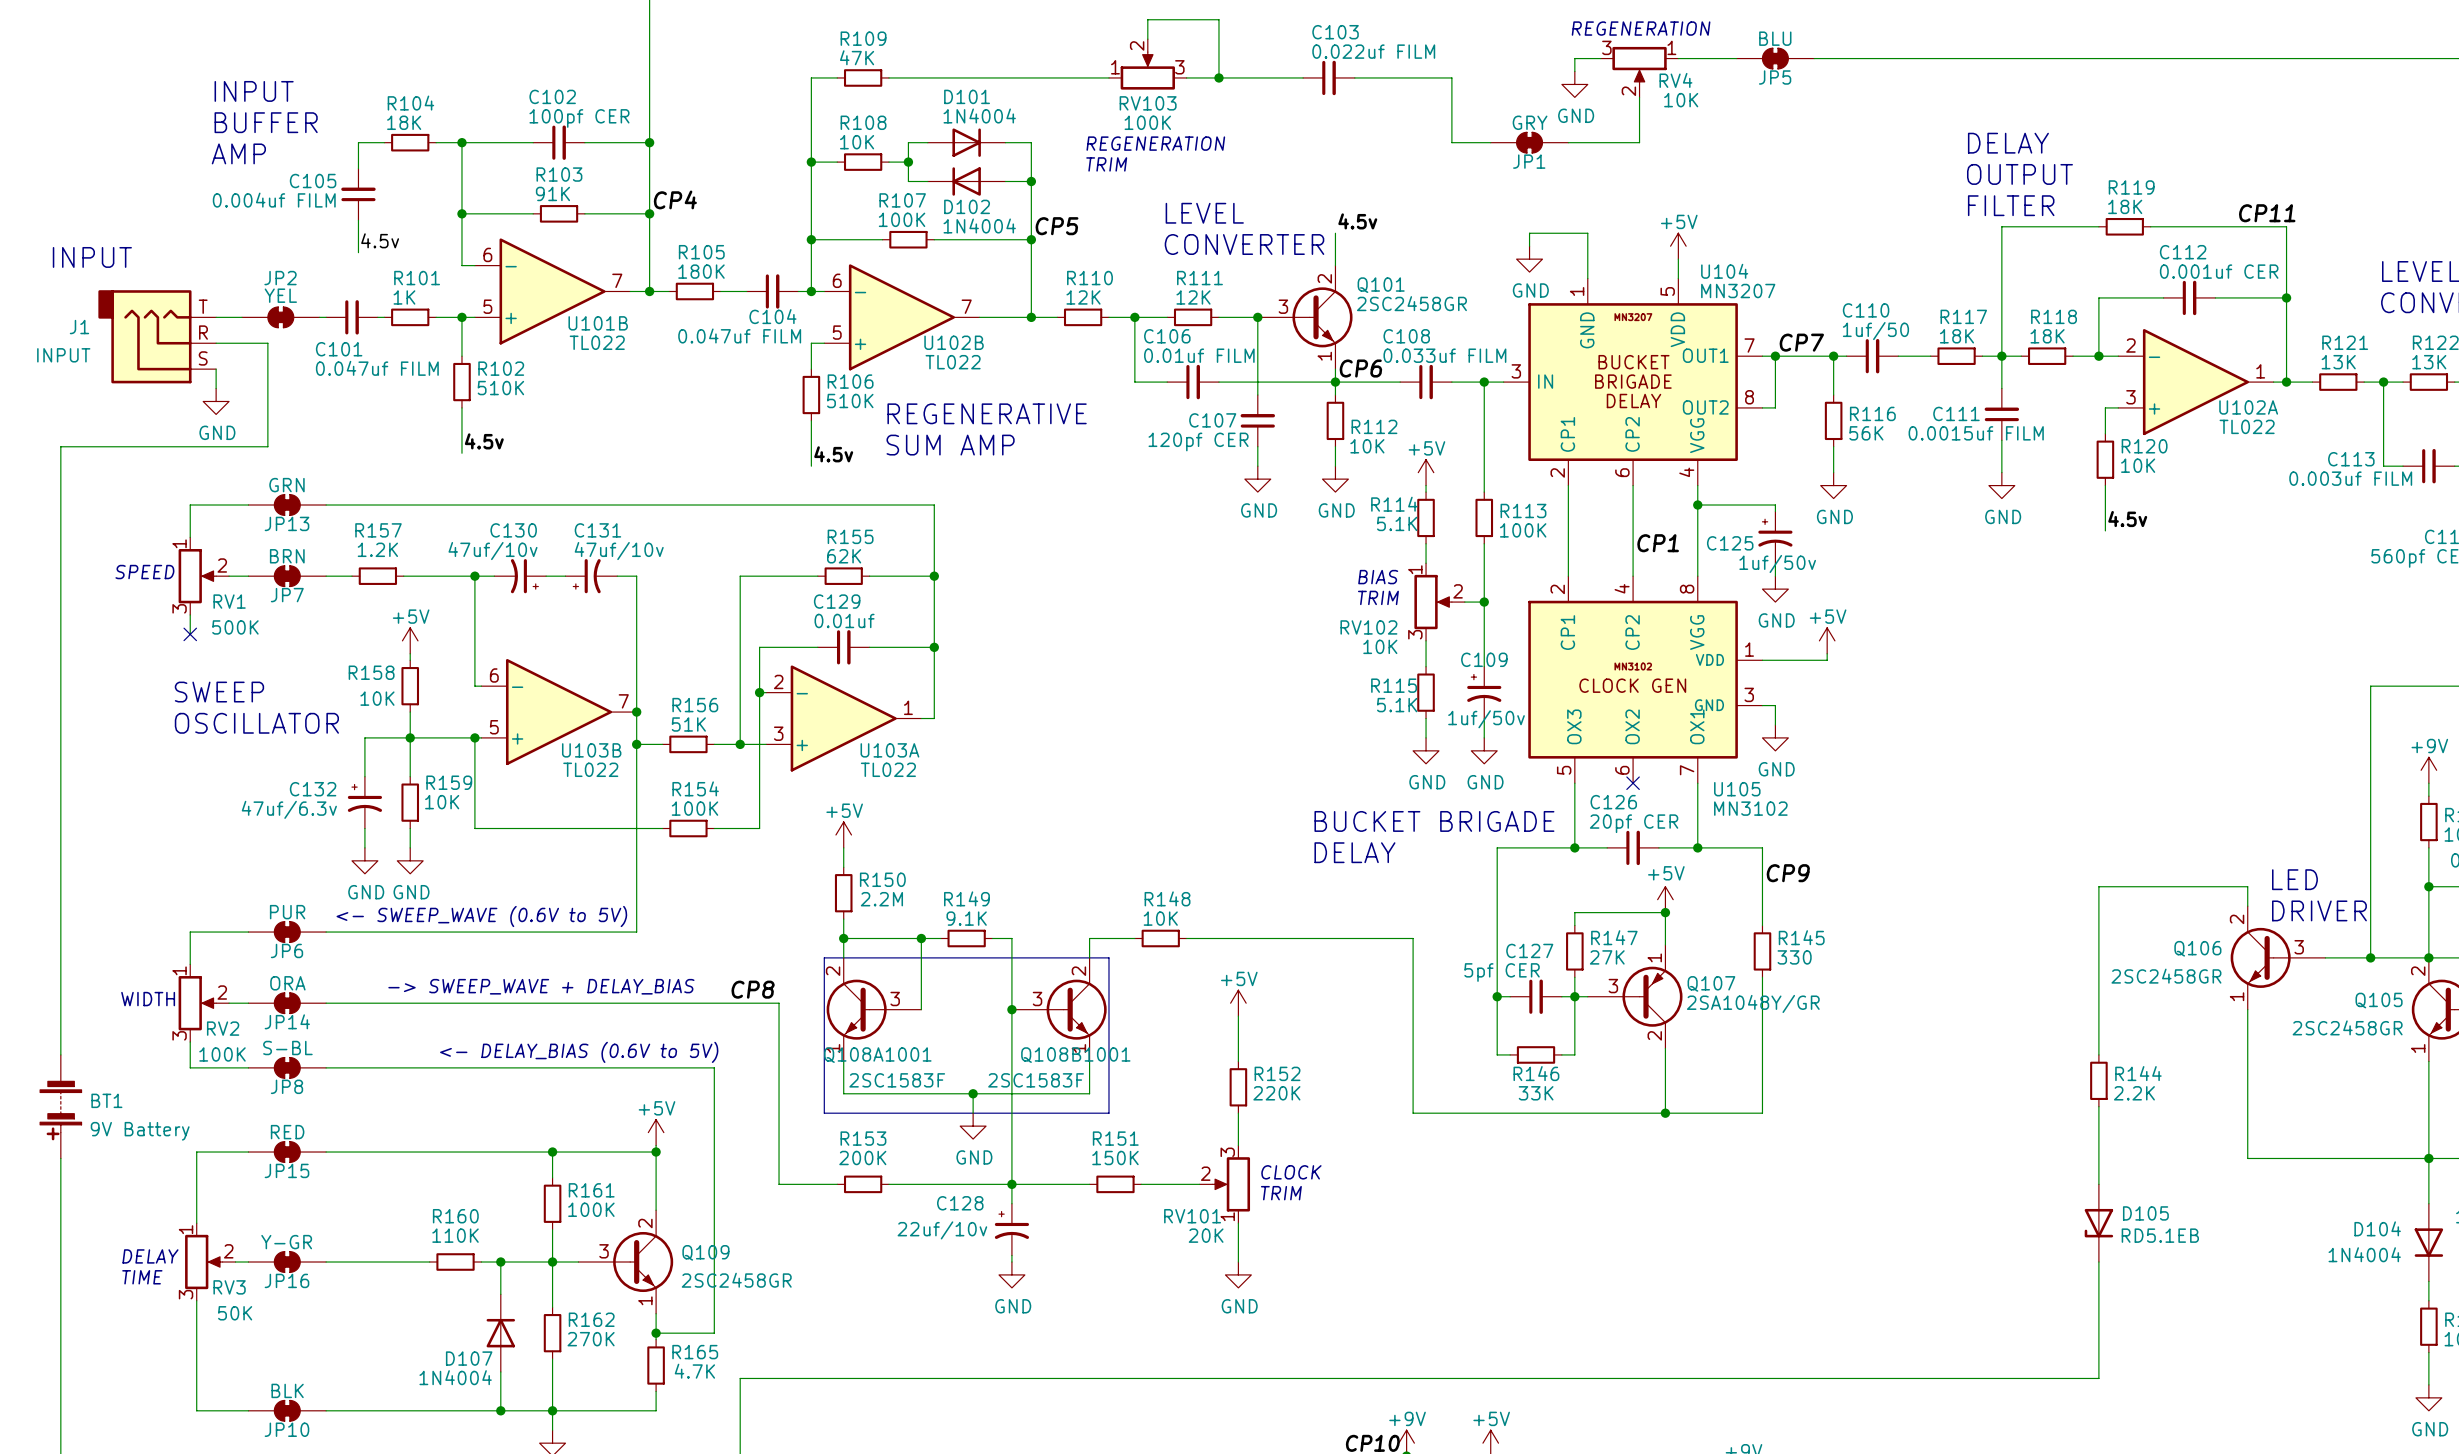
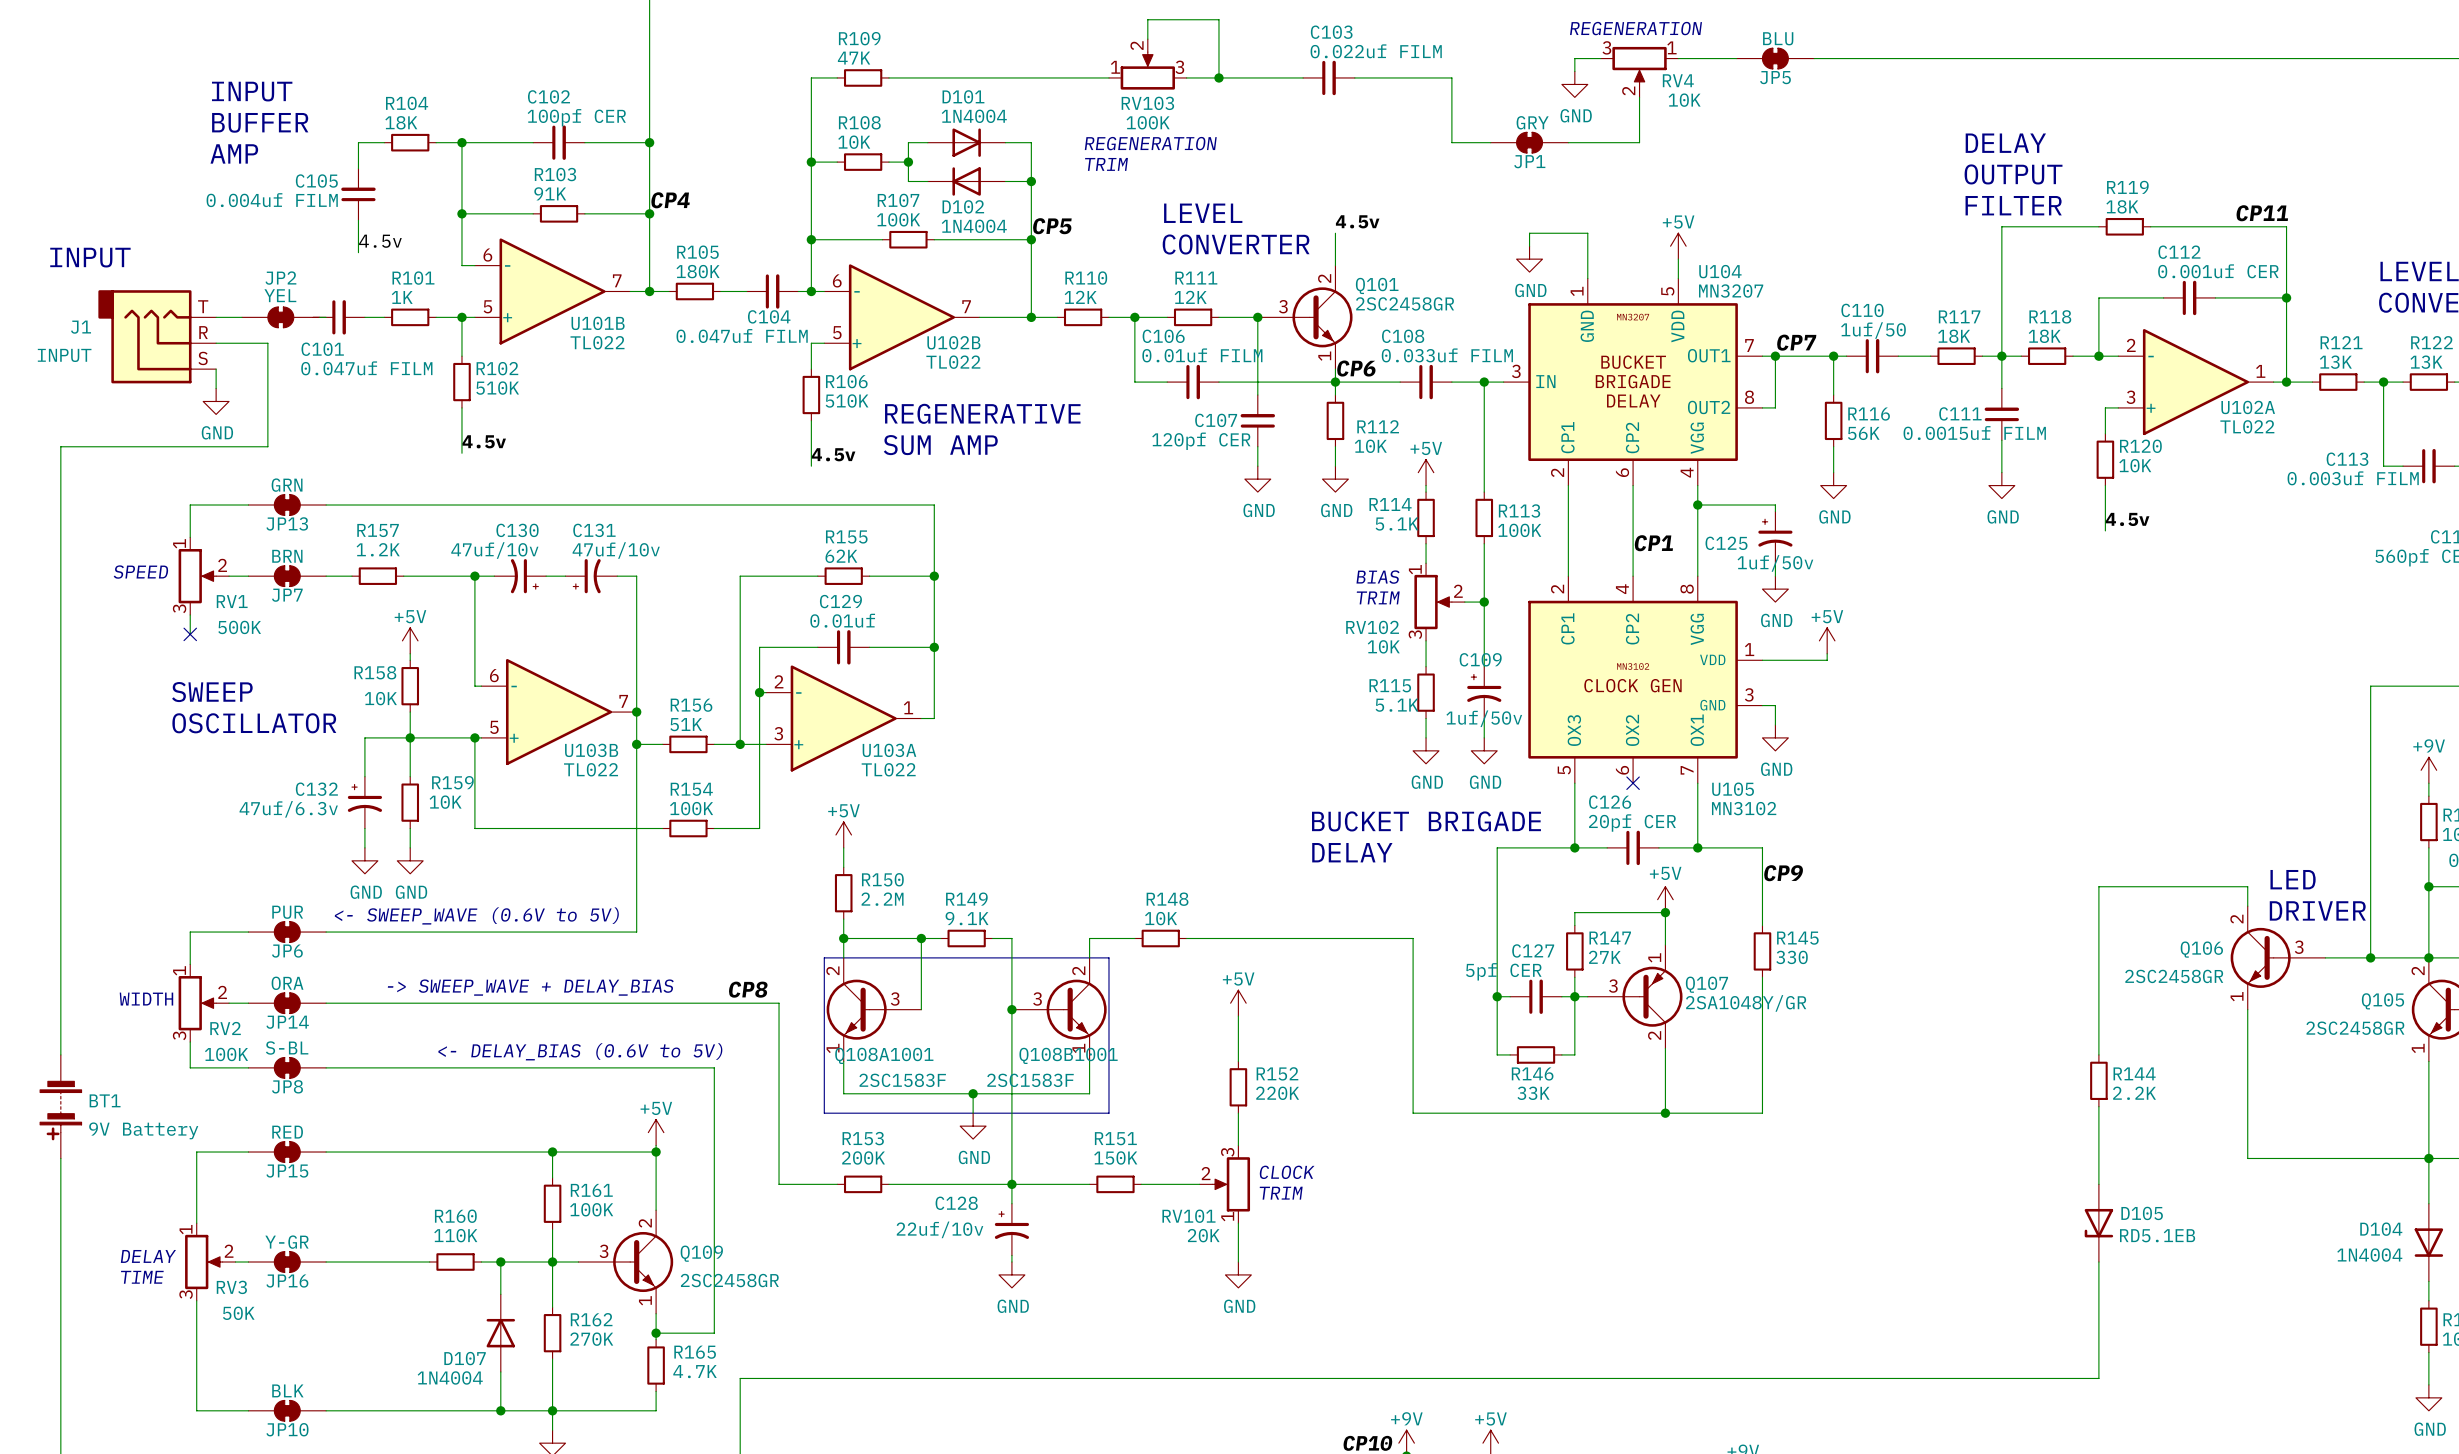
C101 position: (351, 317) -> (339, 317)

